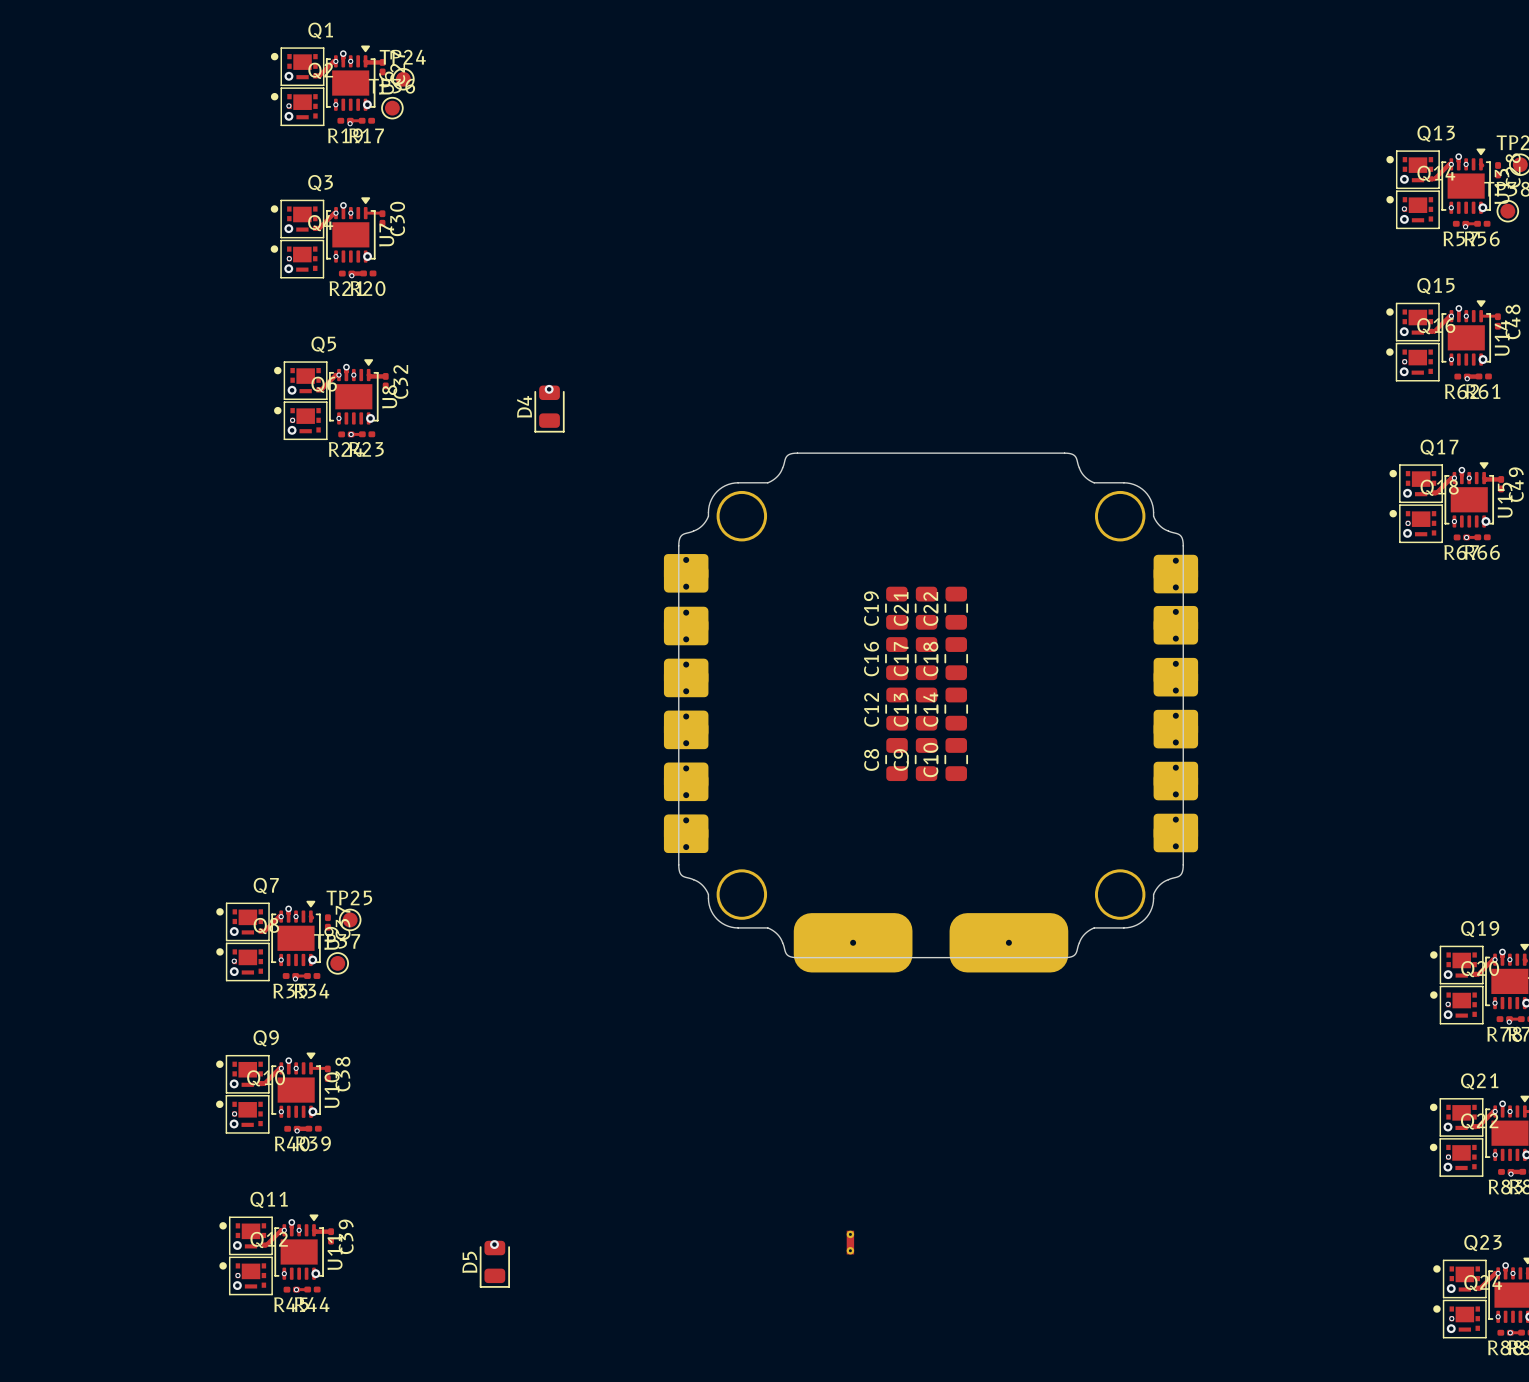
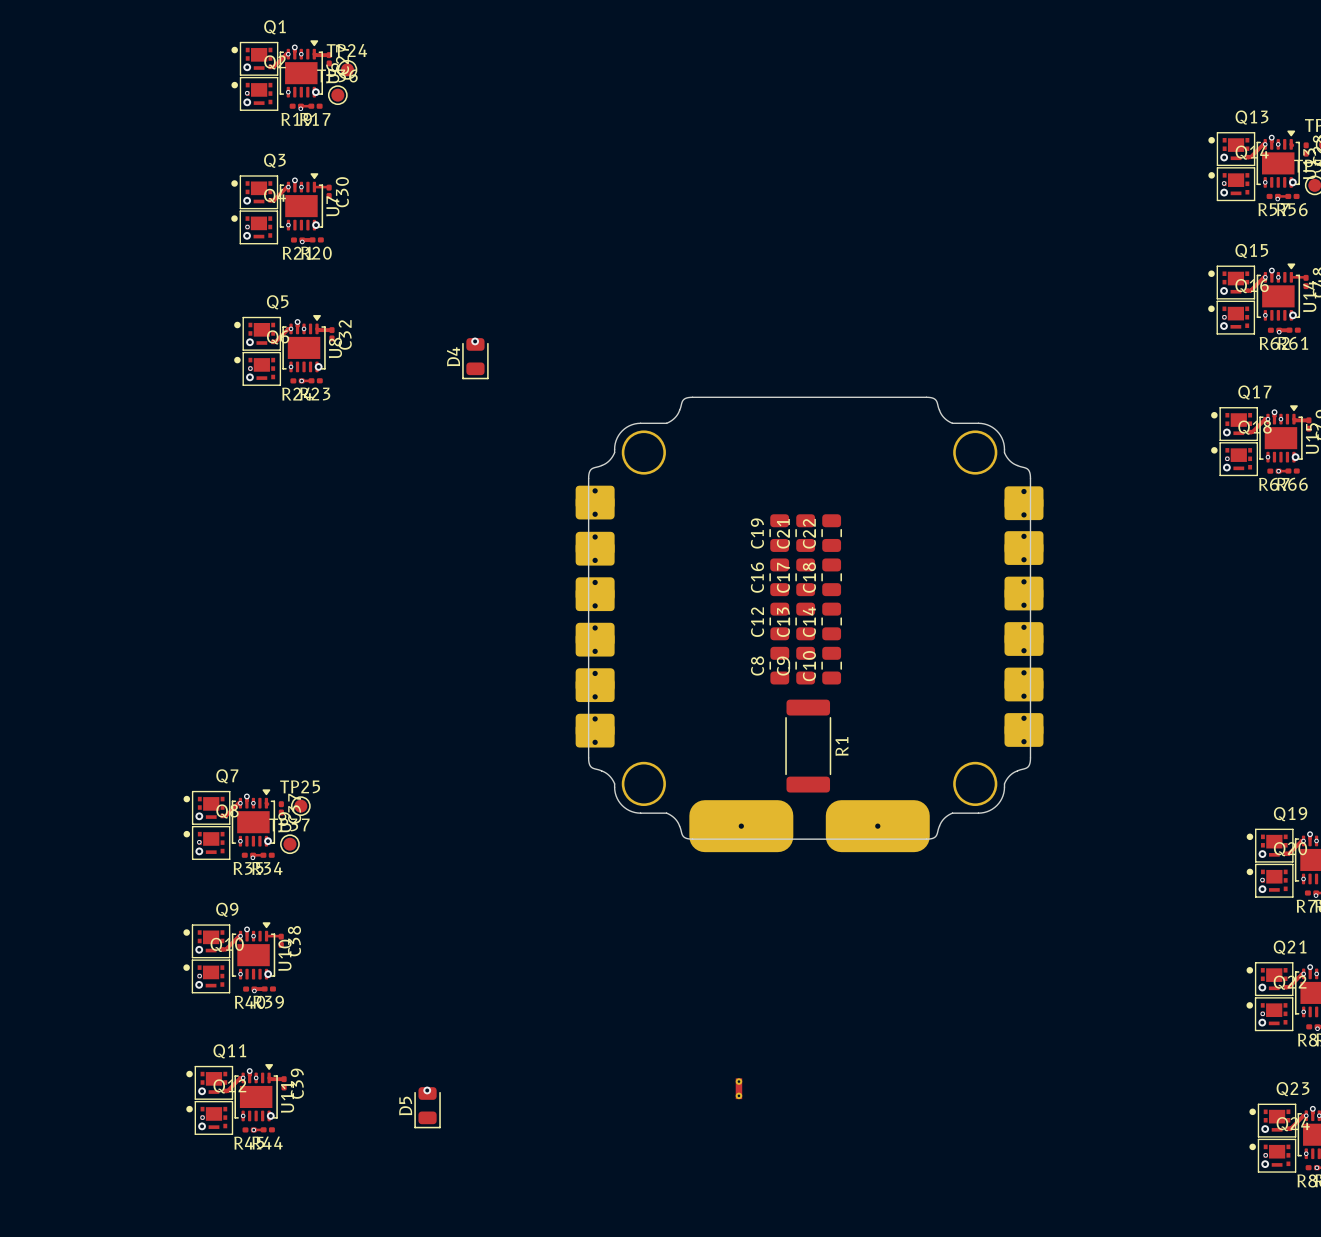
R1: none -> (808, 746)

